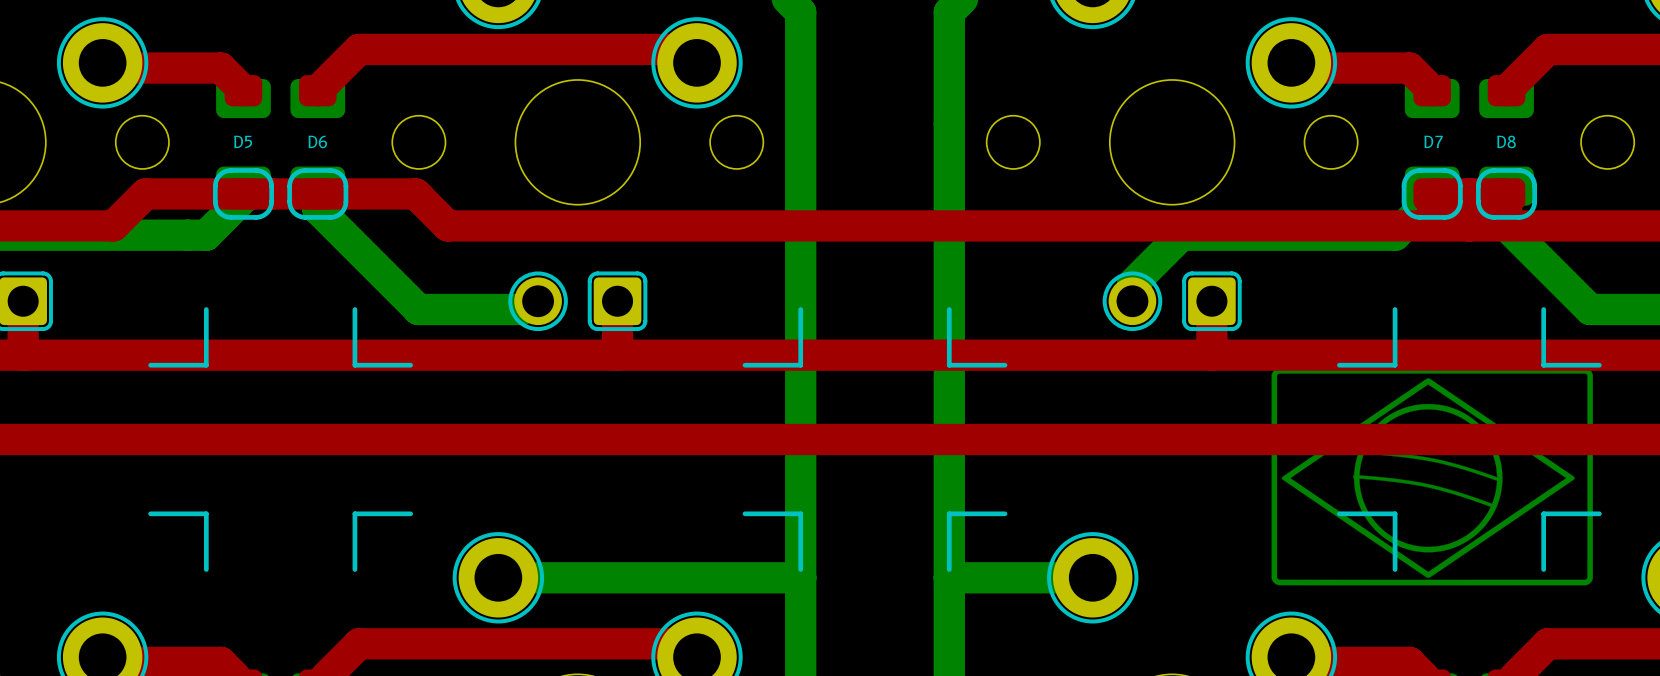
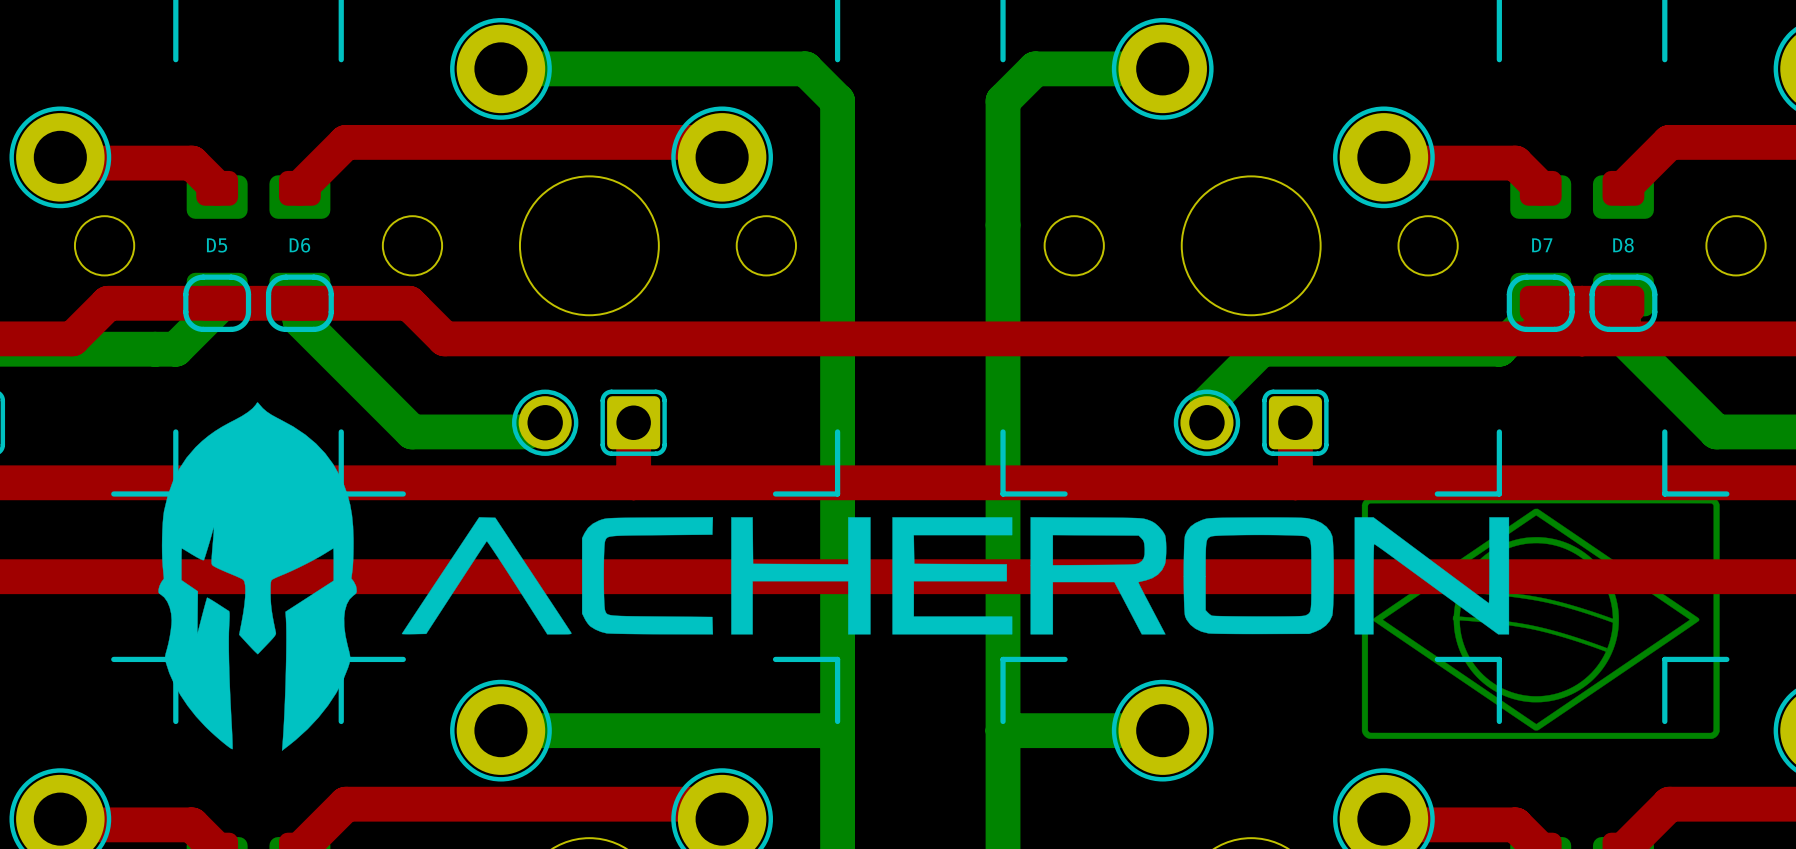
drawing: none -> [158, 402, 1510, 751]

